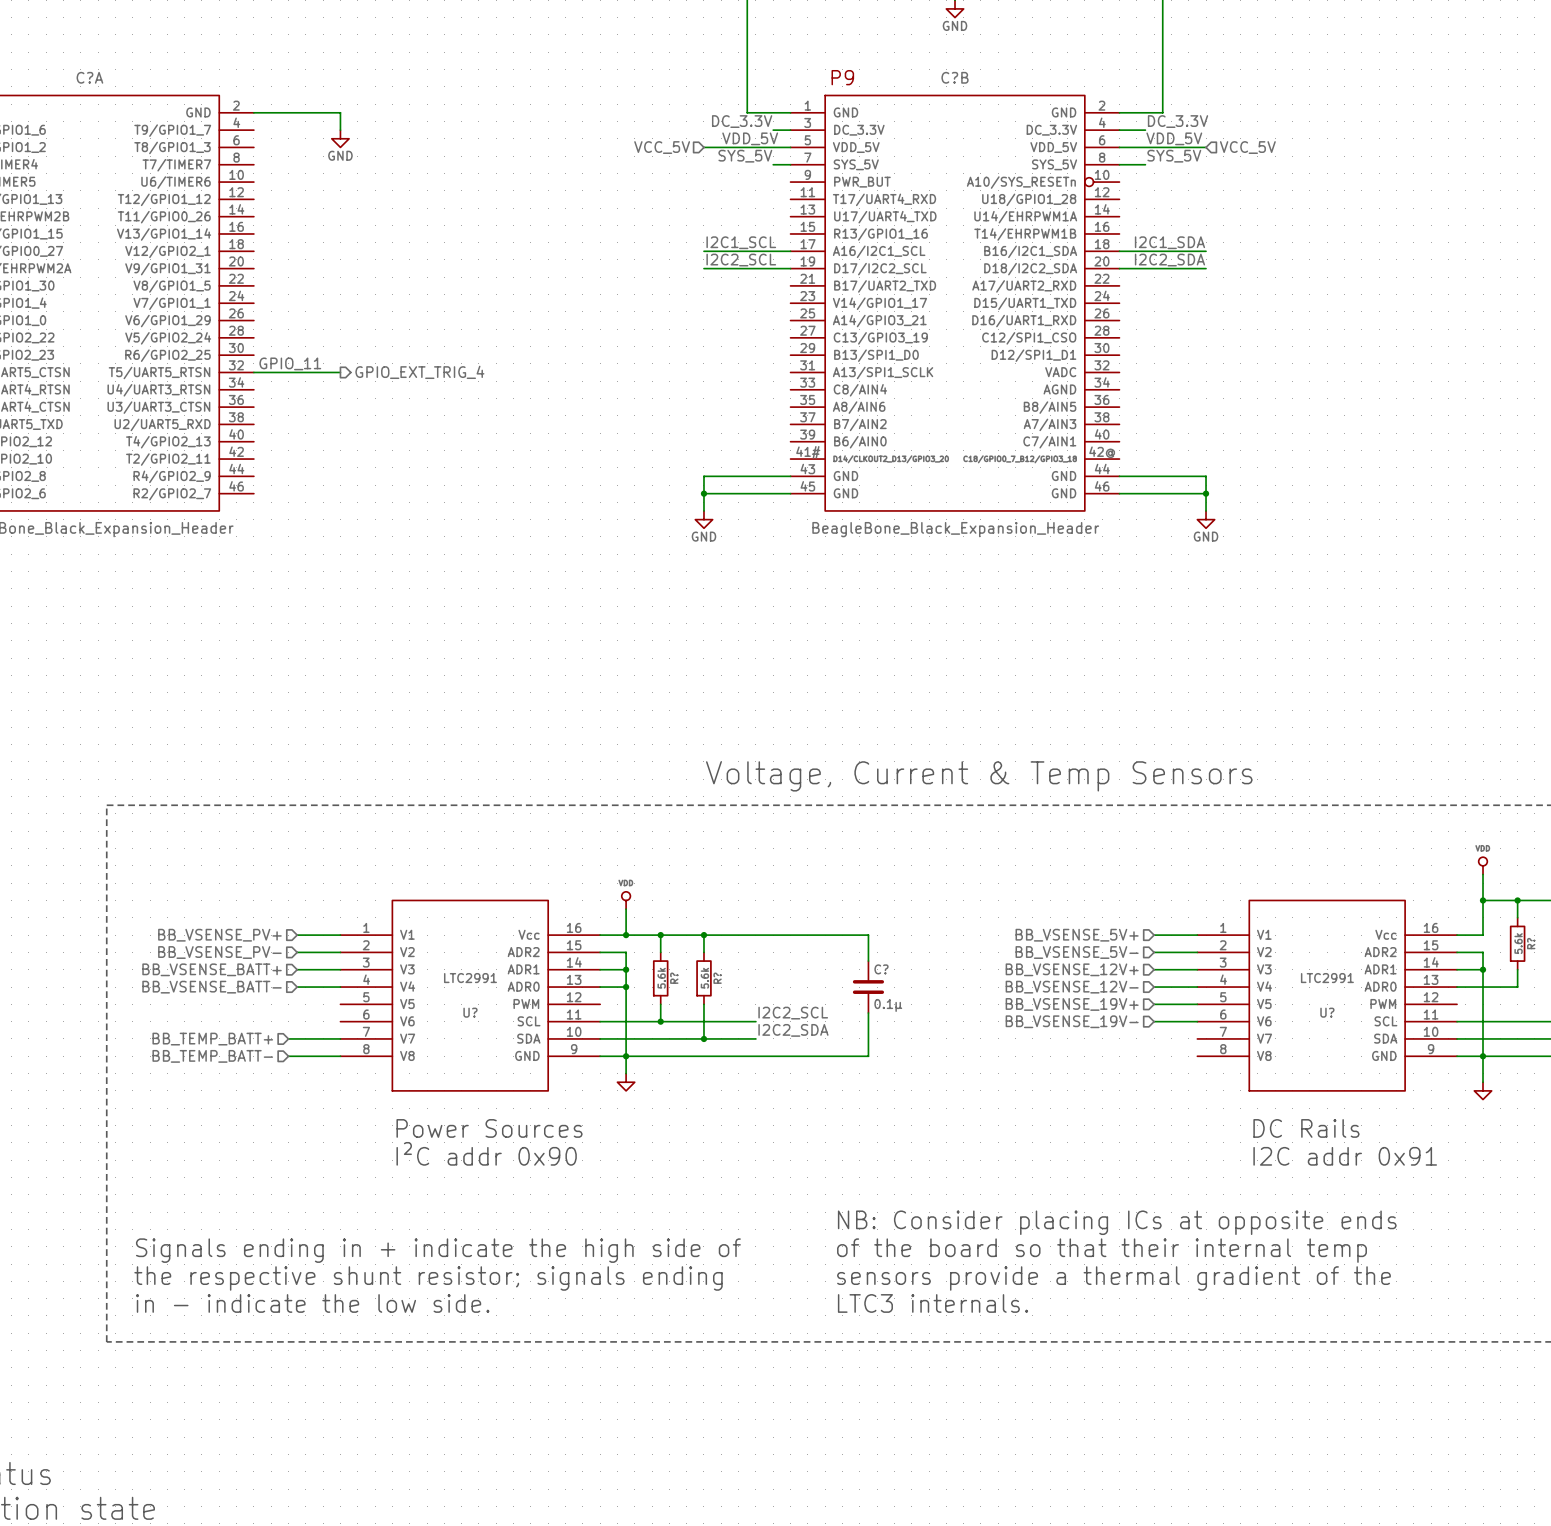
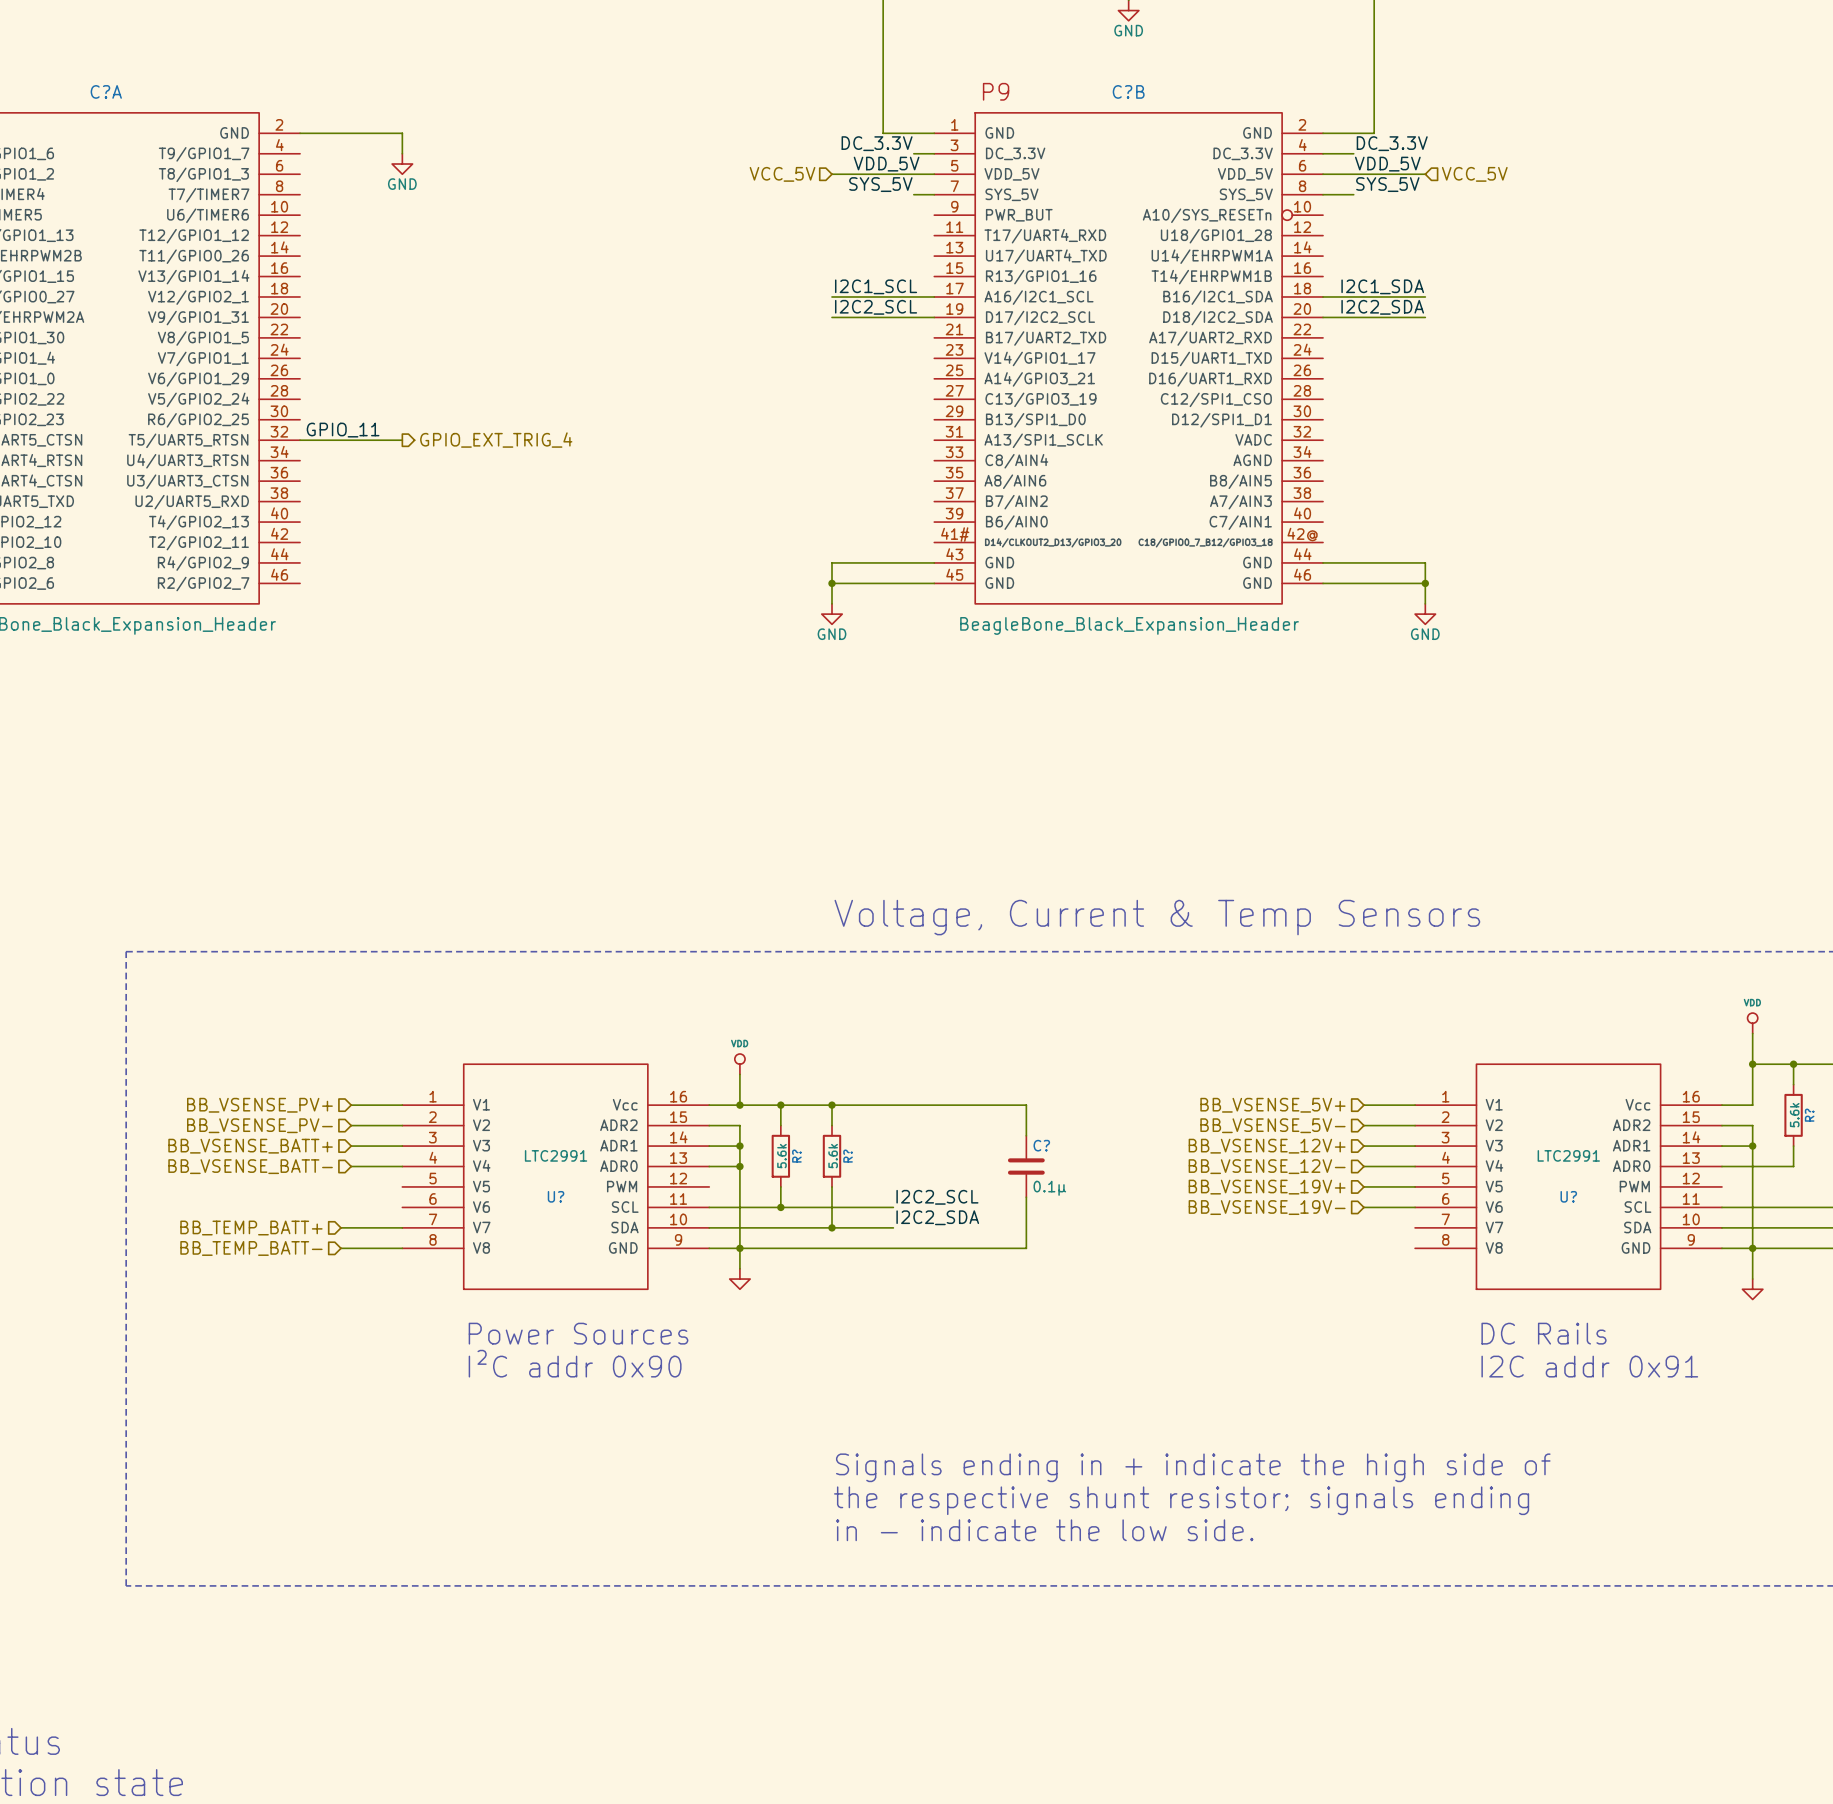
text: NB: Consider placing ICs at opposite ends (1117, 1222) -> none
text: none -> Signals ending in + indicate the high side of (1193, 1467)
text: Signals ending in + indicate the high side of (438, 1250) -> none
text: of the board so that their internal temp (1102, 1250) -> none
text: none -> the respective shunt resistor; signals ending (1181, 1500)
text: the respective shunt resistor; signals ending (428, 1278) -> none
text: sensors provide a thermal gradient of the (1113, 1278) -> none
text: none -> in - indicate the low side. (1044, 1530)
text: in - indicate the low side. (312, 1303) -> none
text: LTC3 internals. (933, 1303) -> none

